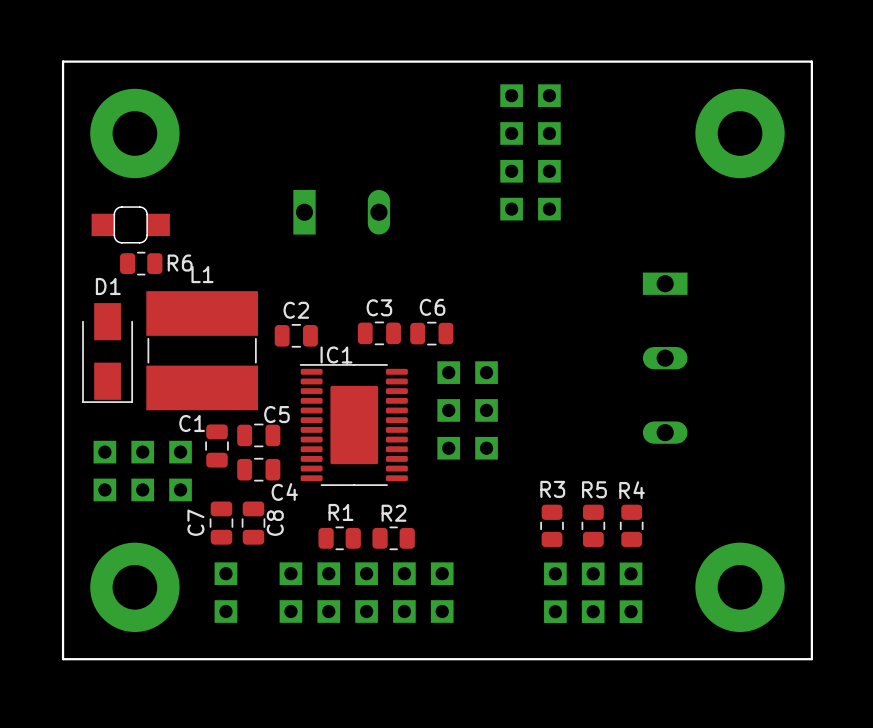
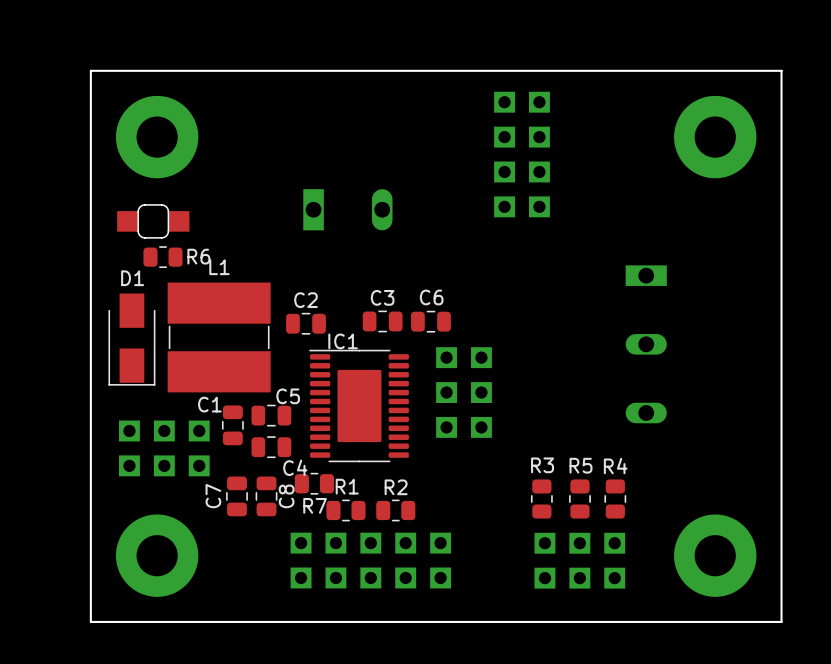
R7: none -> (314, 483)
part: (225, 592) -> none

